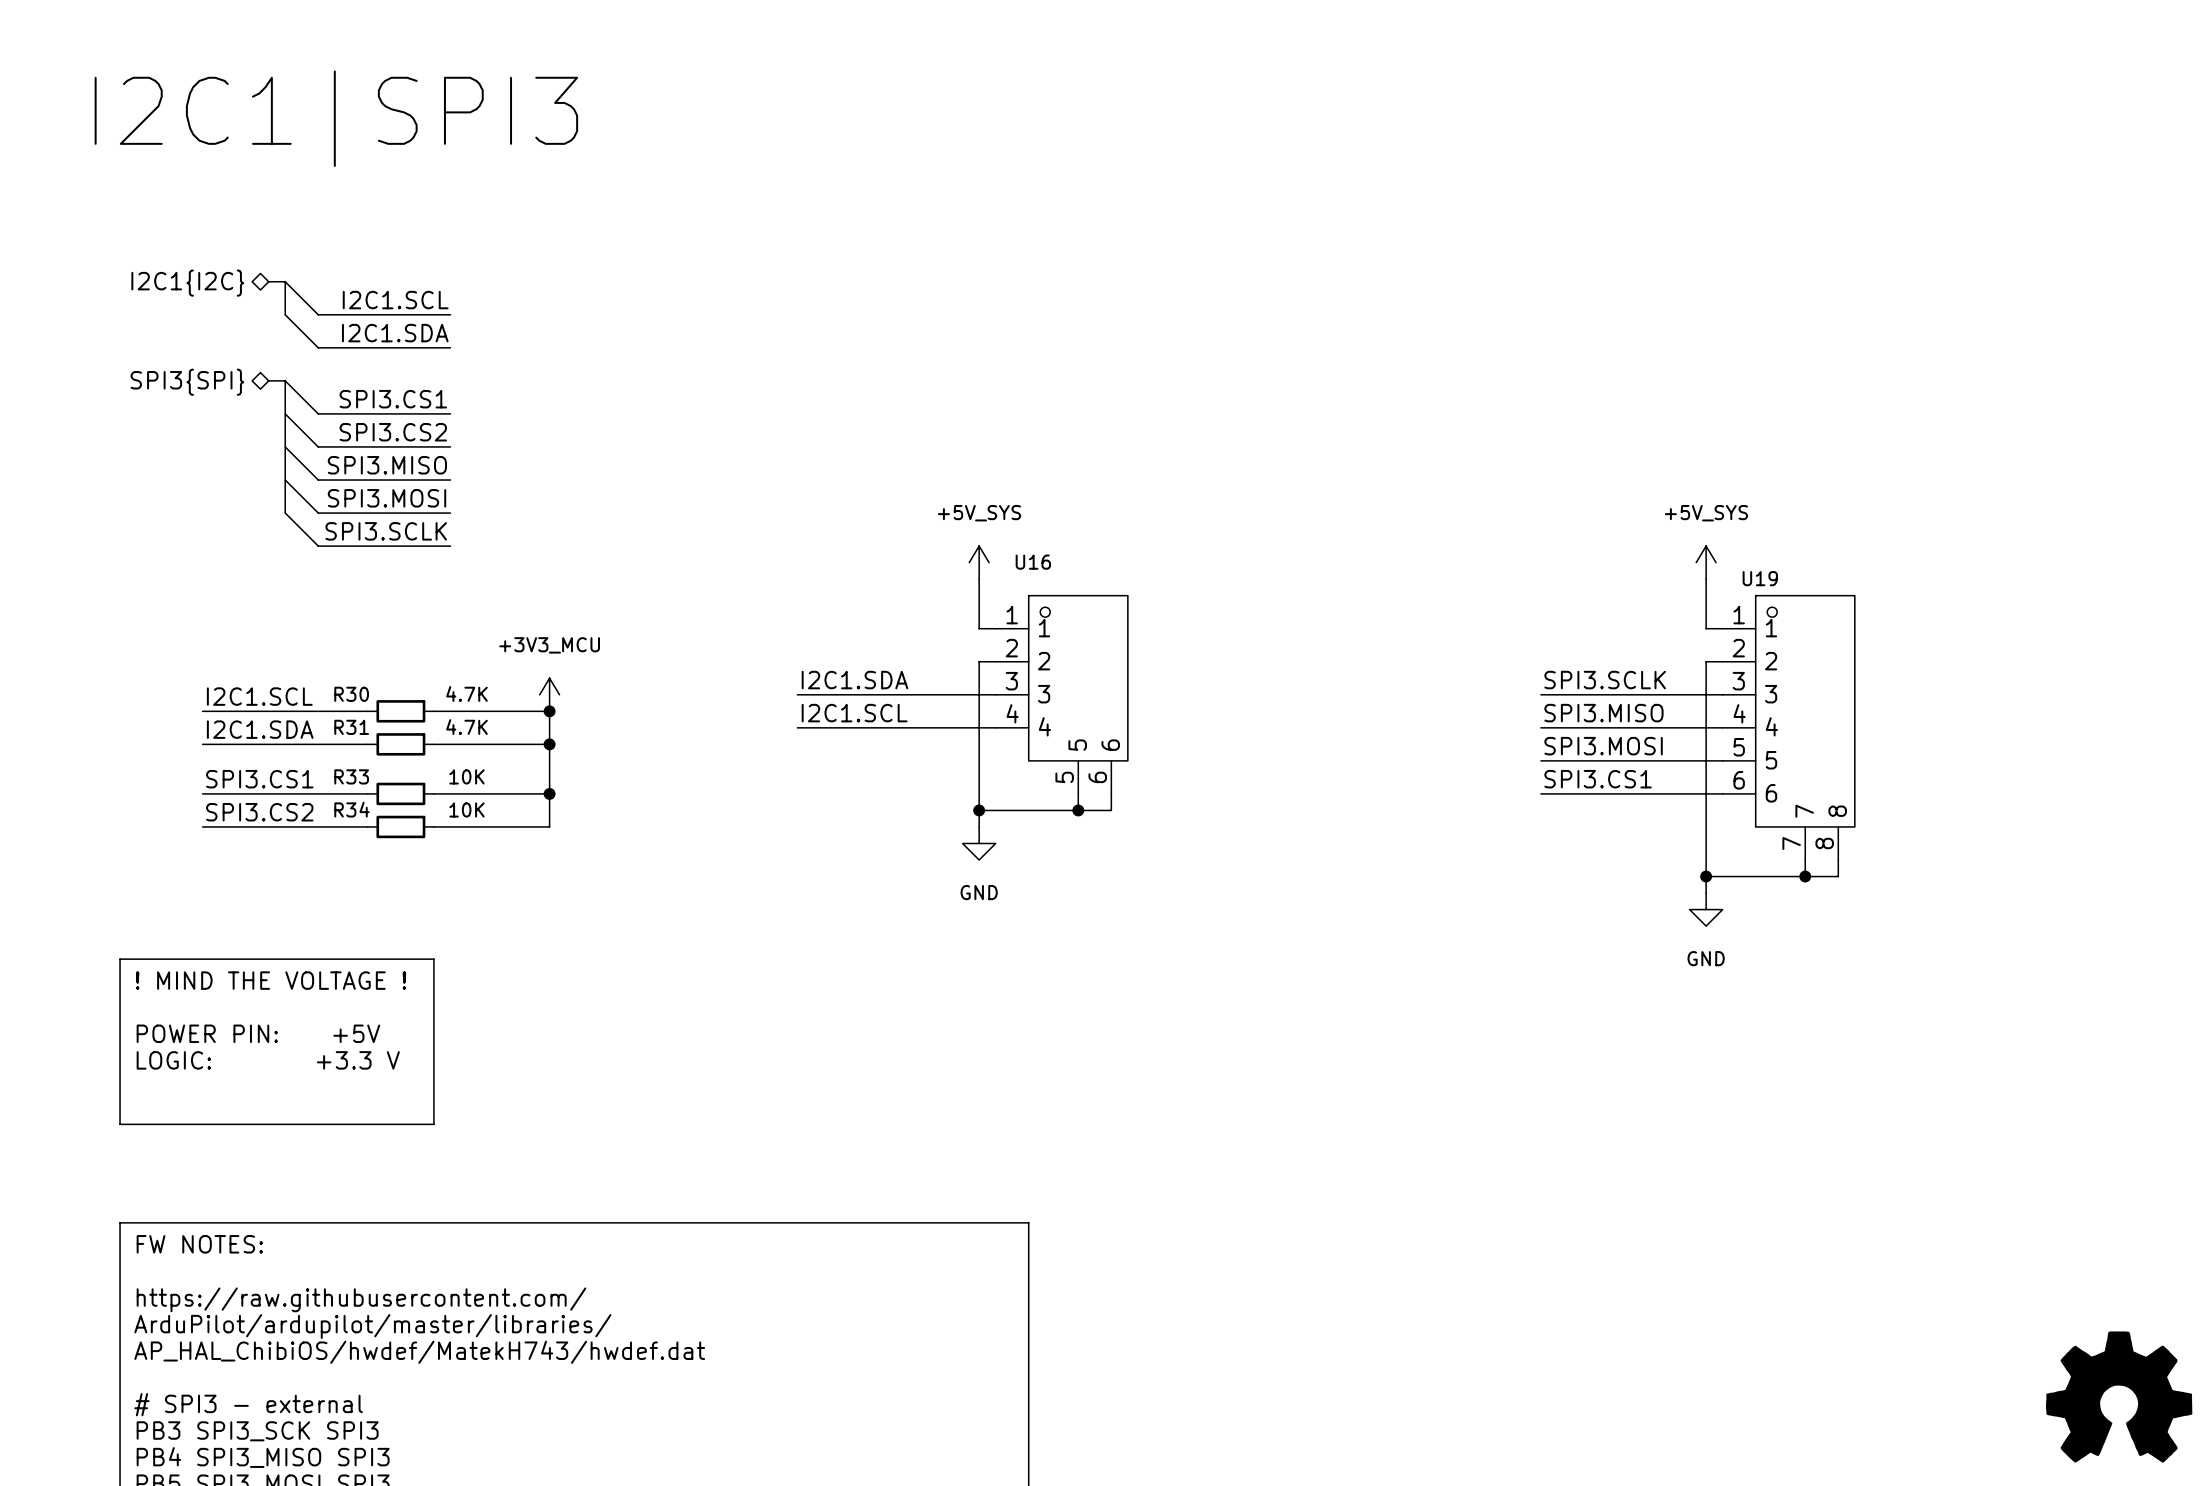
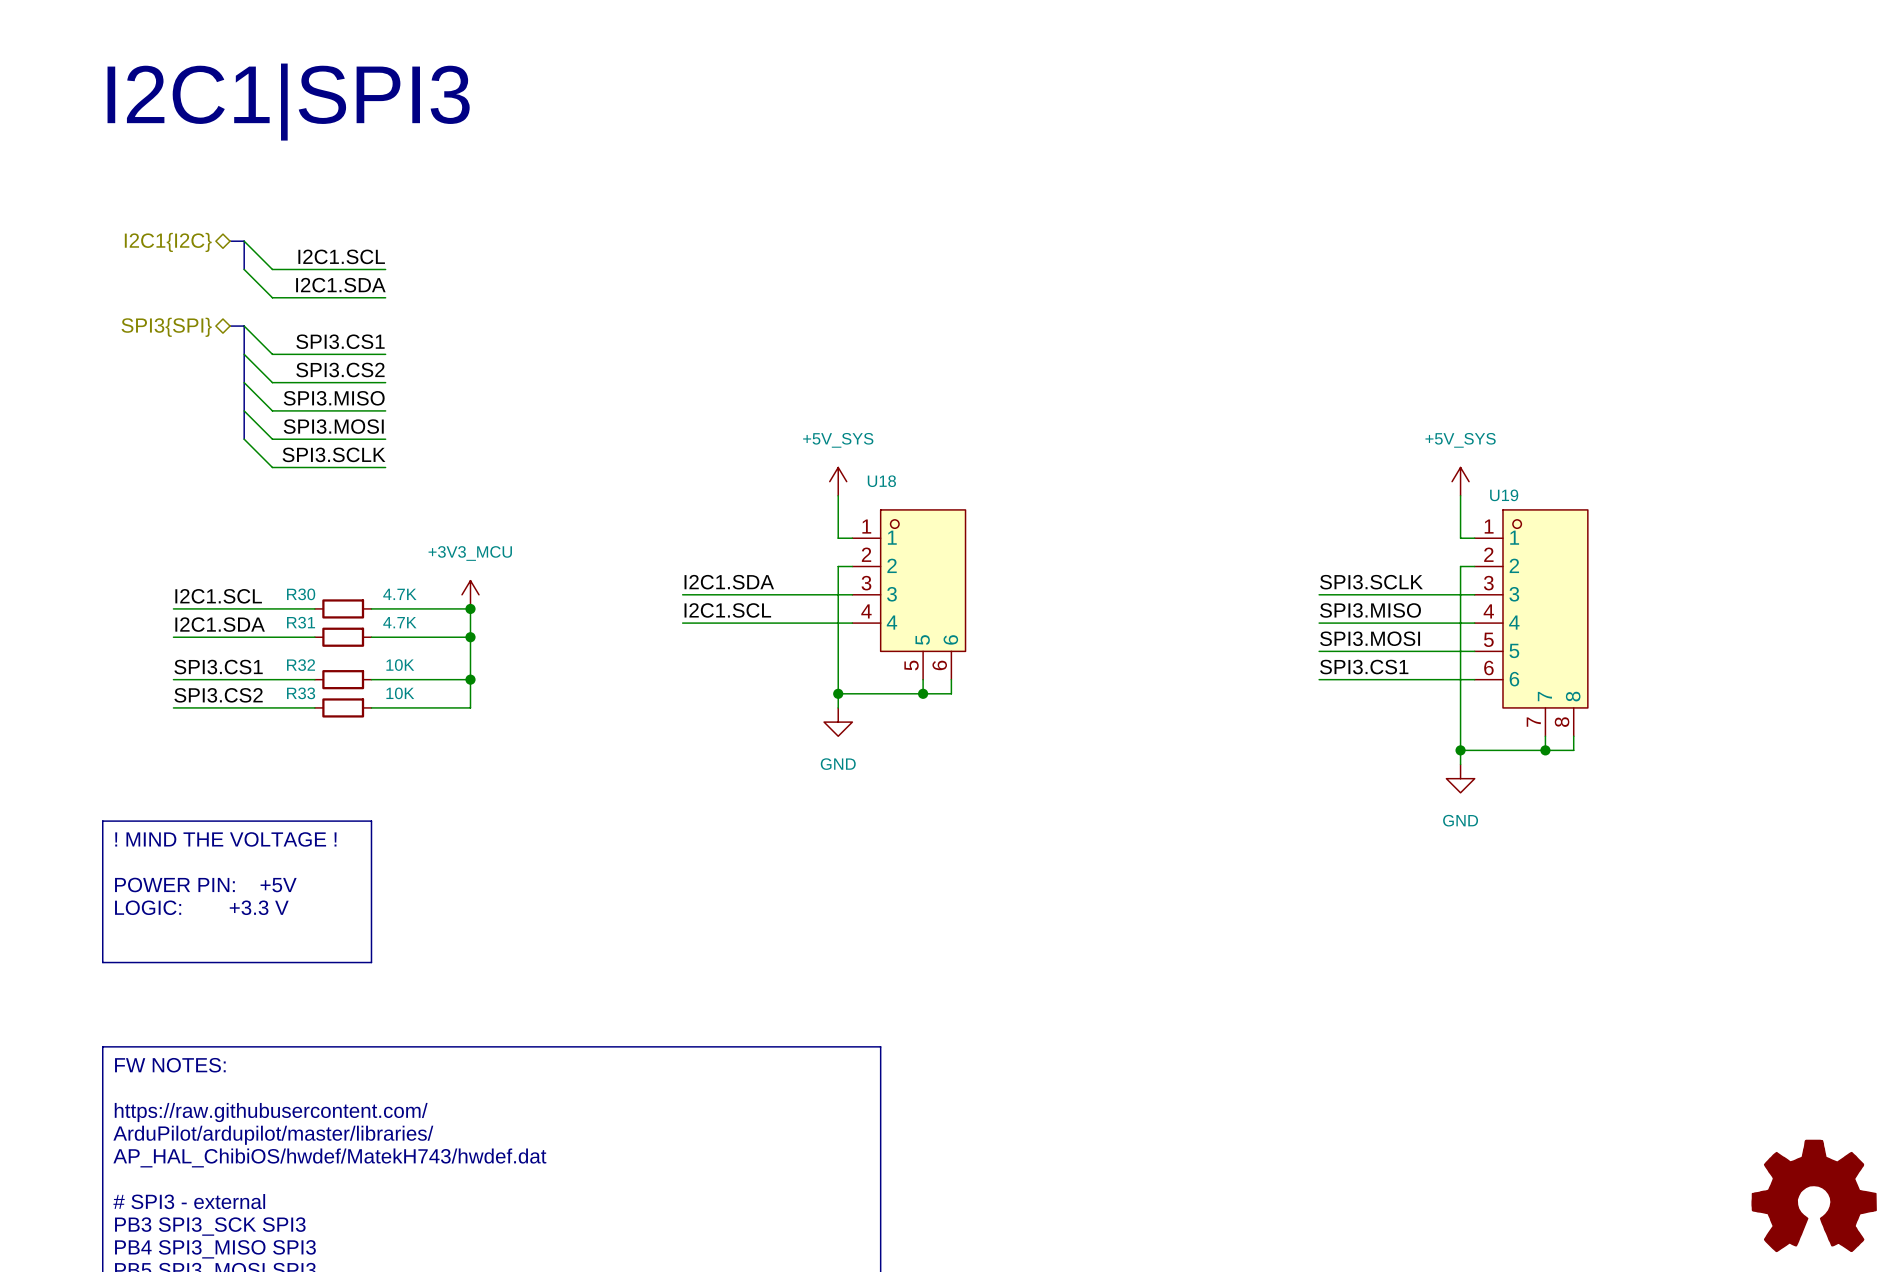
U16 name: U16 (1033, 562) -> U18 (881, 481)
R33 name: R33 (351, 776) -> R32 (301, 665)
R34 name: R34 (351, 809) -> R33 (301, 693)

